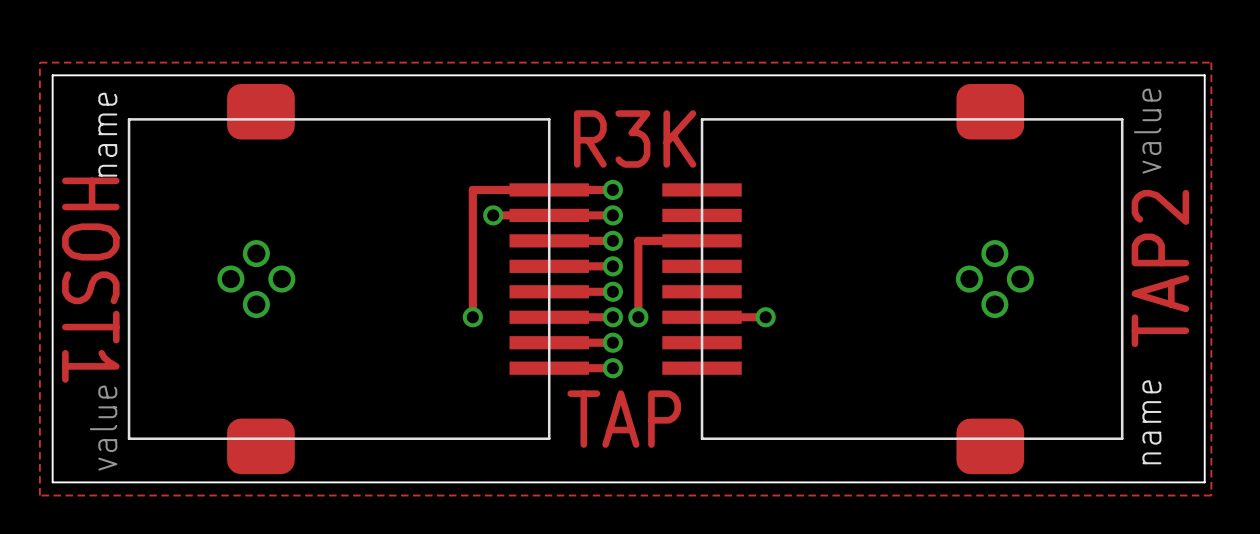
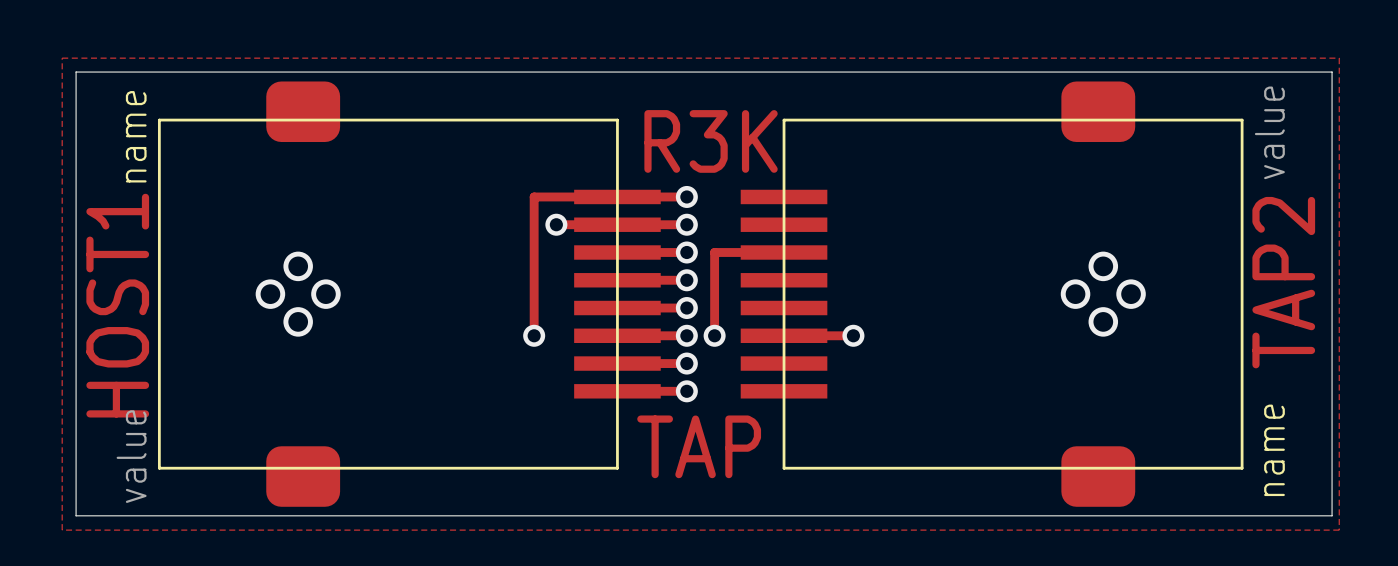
text rotation: 0° (90, 280) -> 180° (117, 305)

